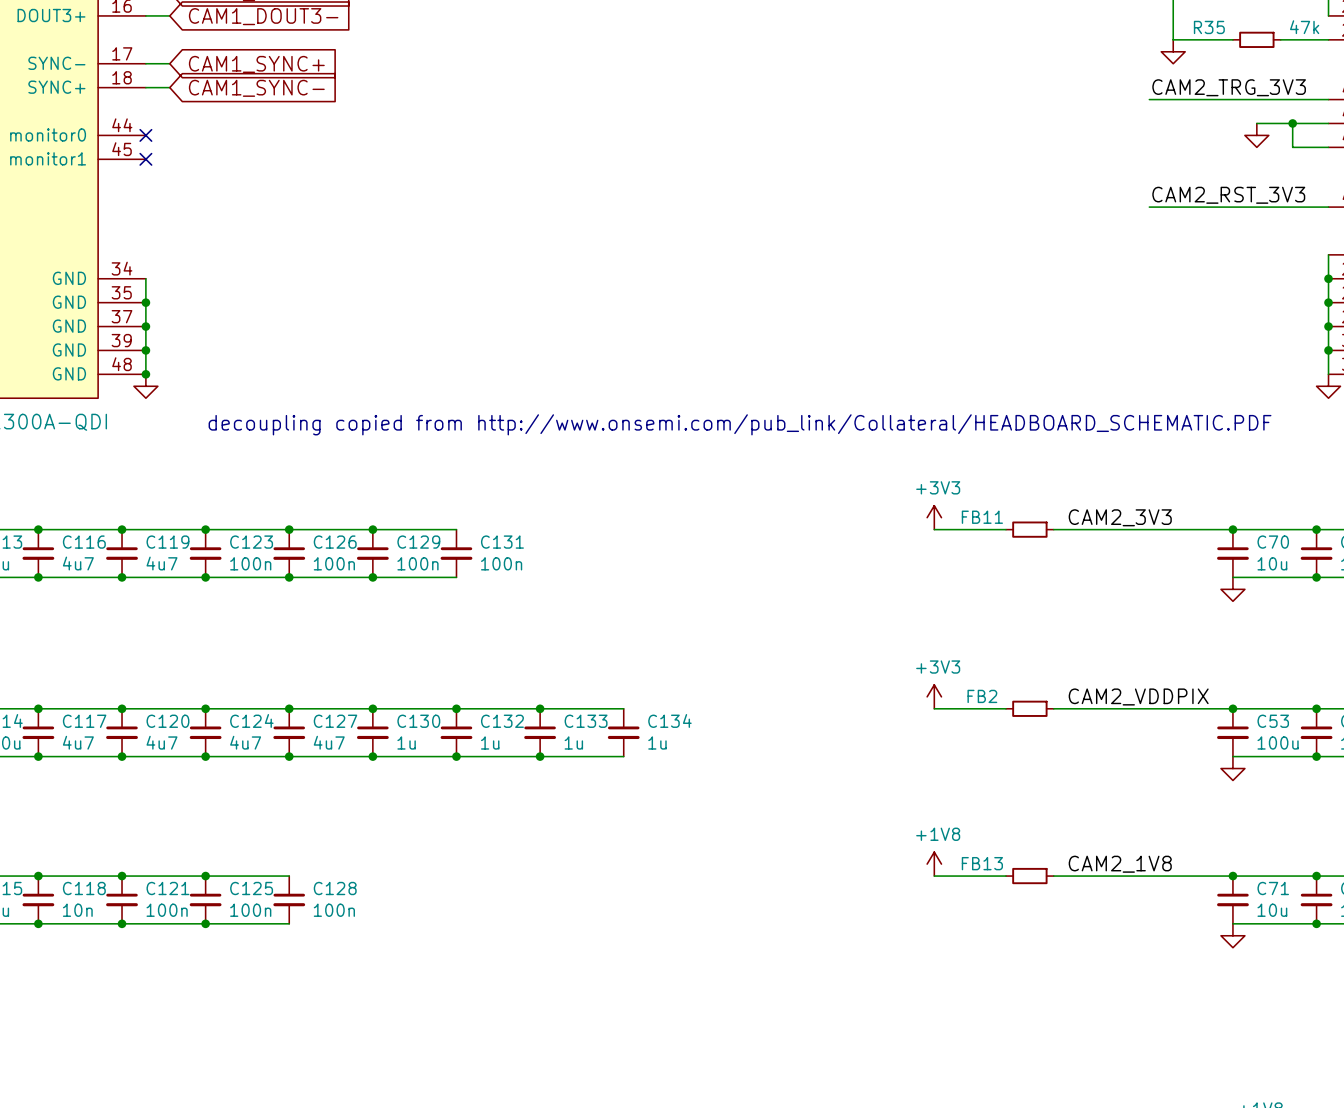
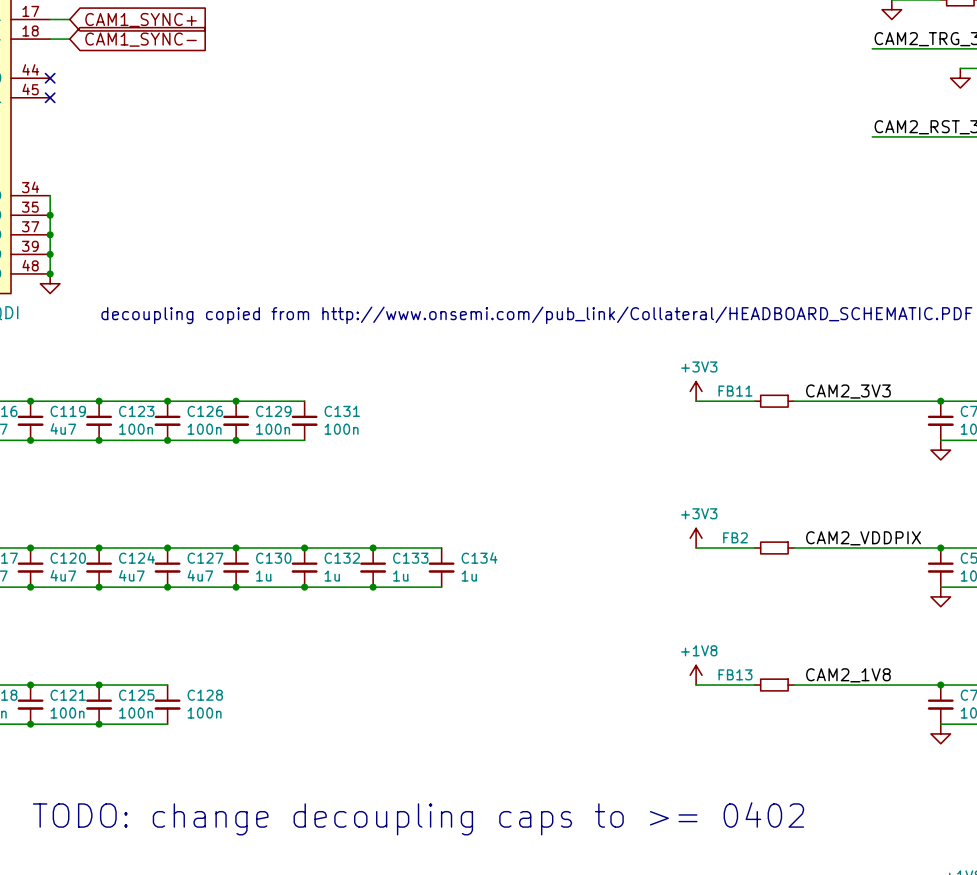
text: none -> TODO: change decoupling caps to >= 0402 (418, 818)

